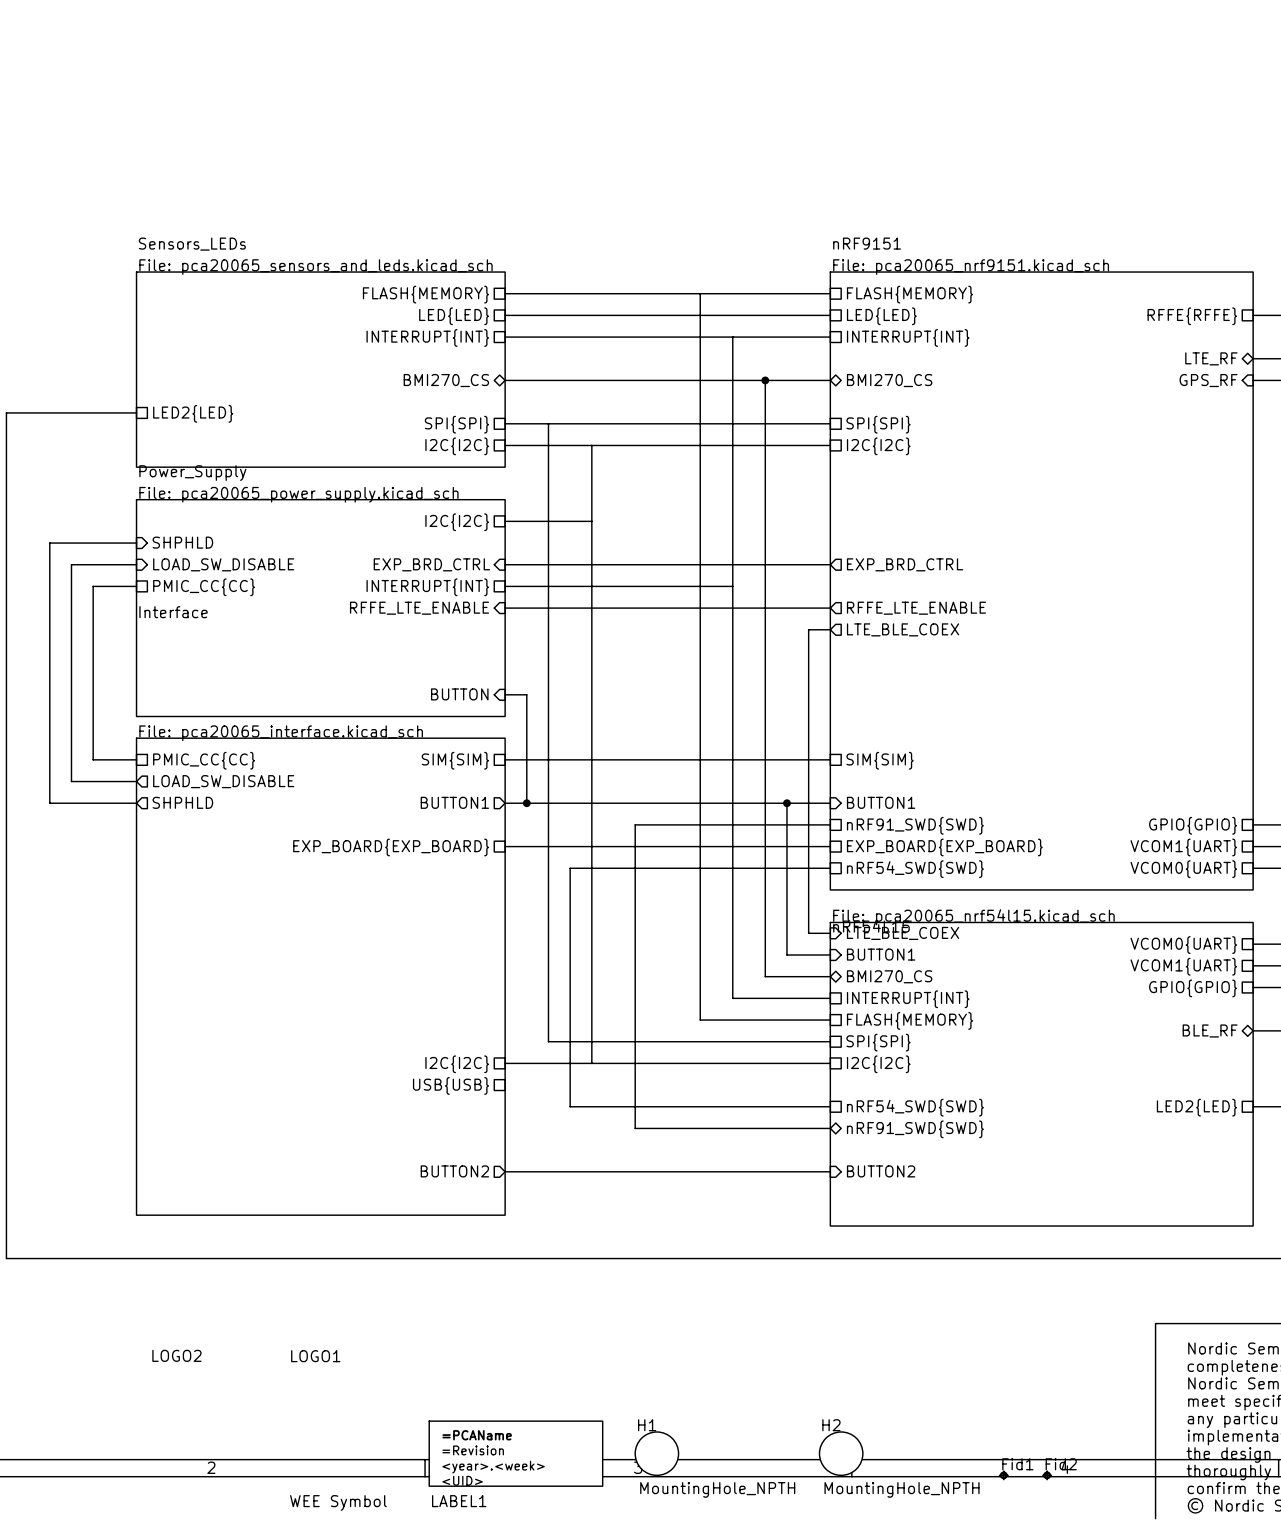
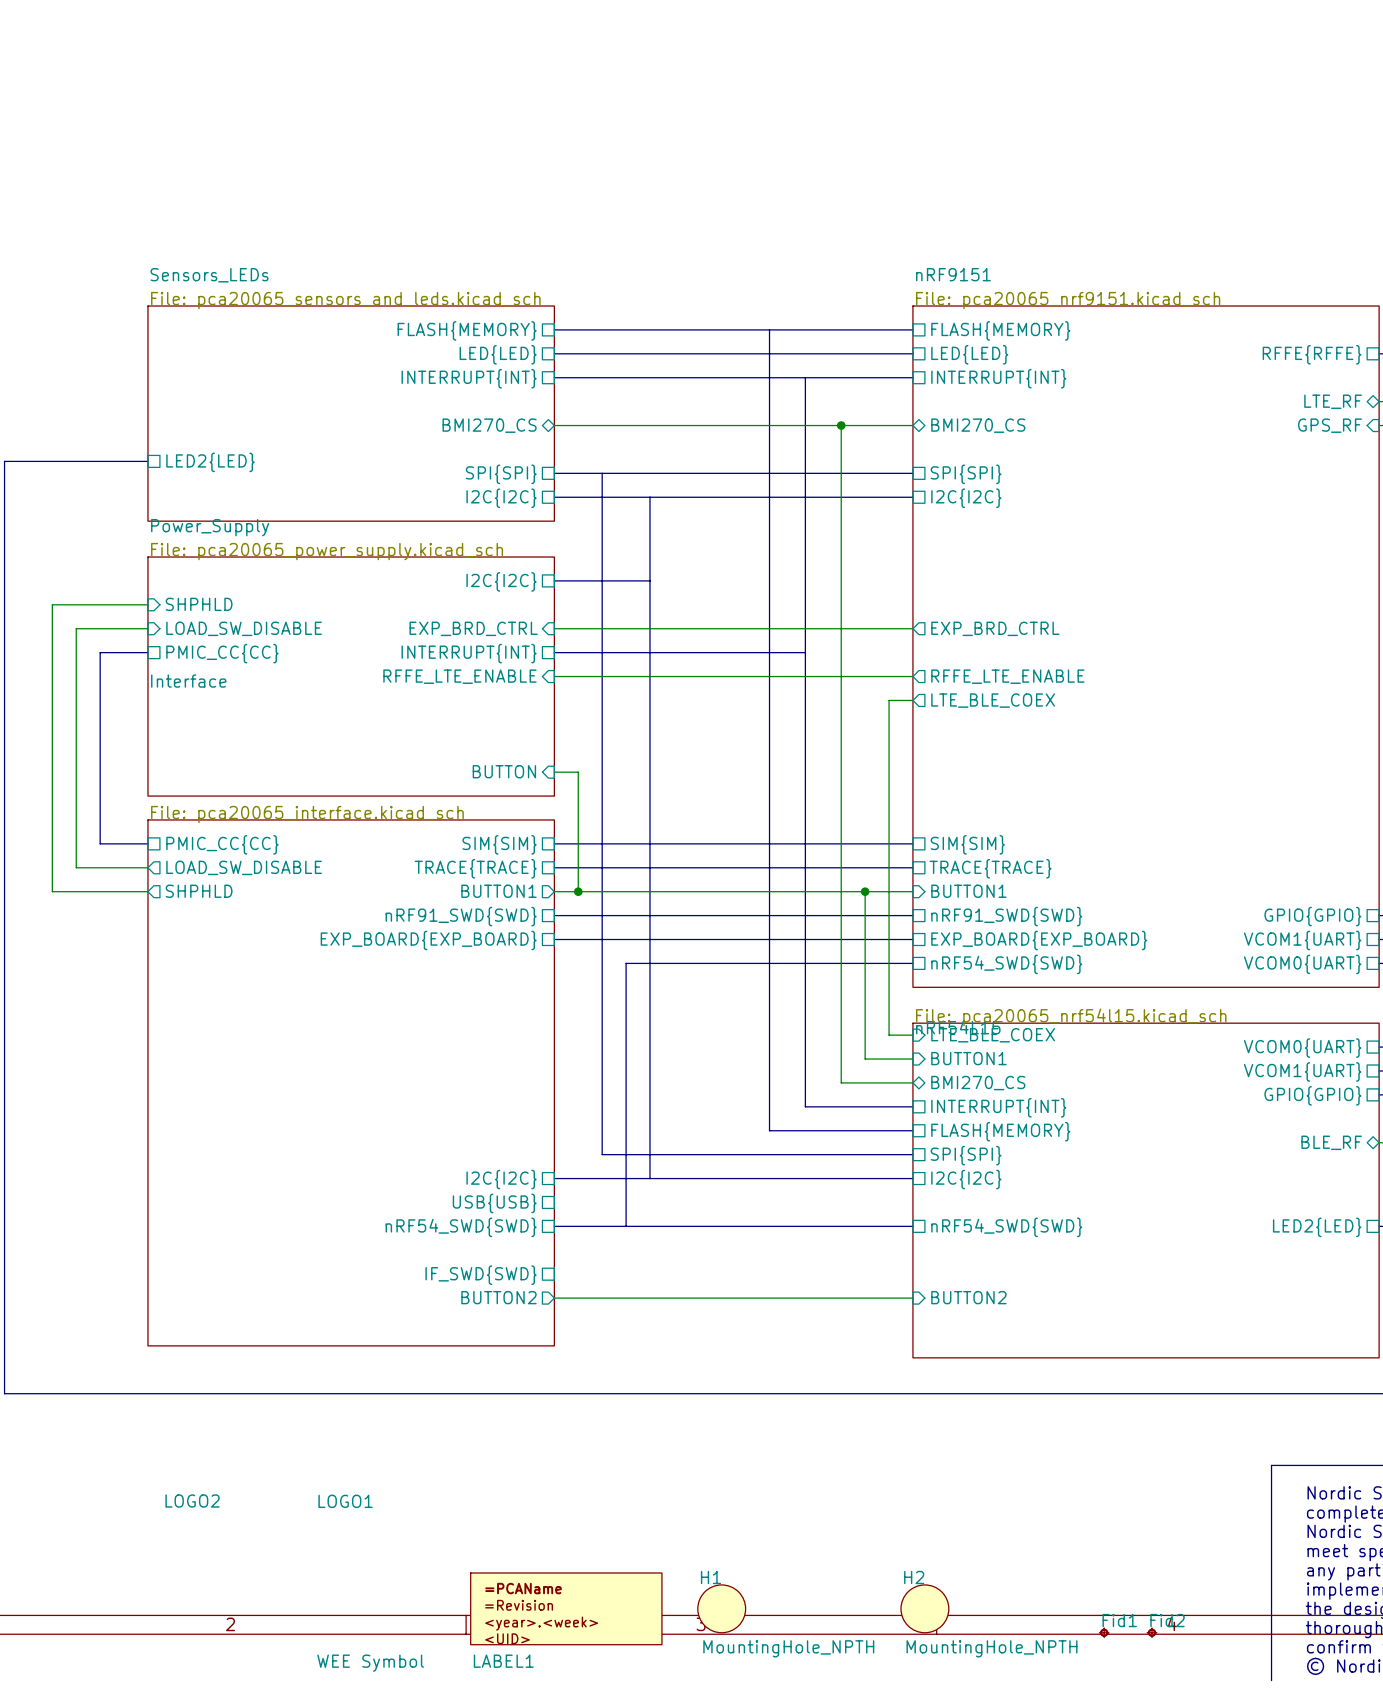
bus: none -> (554, 867) (912, 867)
sheet pin: none -> TRACE{TRACE} (475, 868)
sheet pin: none -> TRACE{TRACE} (990, 868)
bus: (635, 824) (635, 1128) (830, 1128) -> (697, 915) (554, 915)
sheet pin: none -> nRF91_SWD{SWD} (461, 916)
bus: none -> (554, 1226) (626, 1226)
sheet pin: none -> nRF54_SWD{SWD} (461, 1227)
sheet pin: nRF91_SWD{SWD} (915, 1129) -> none
sheet pin: none -> IF_SWD{SWD} (481, 1275)

